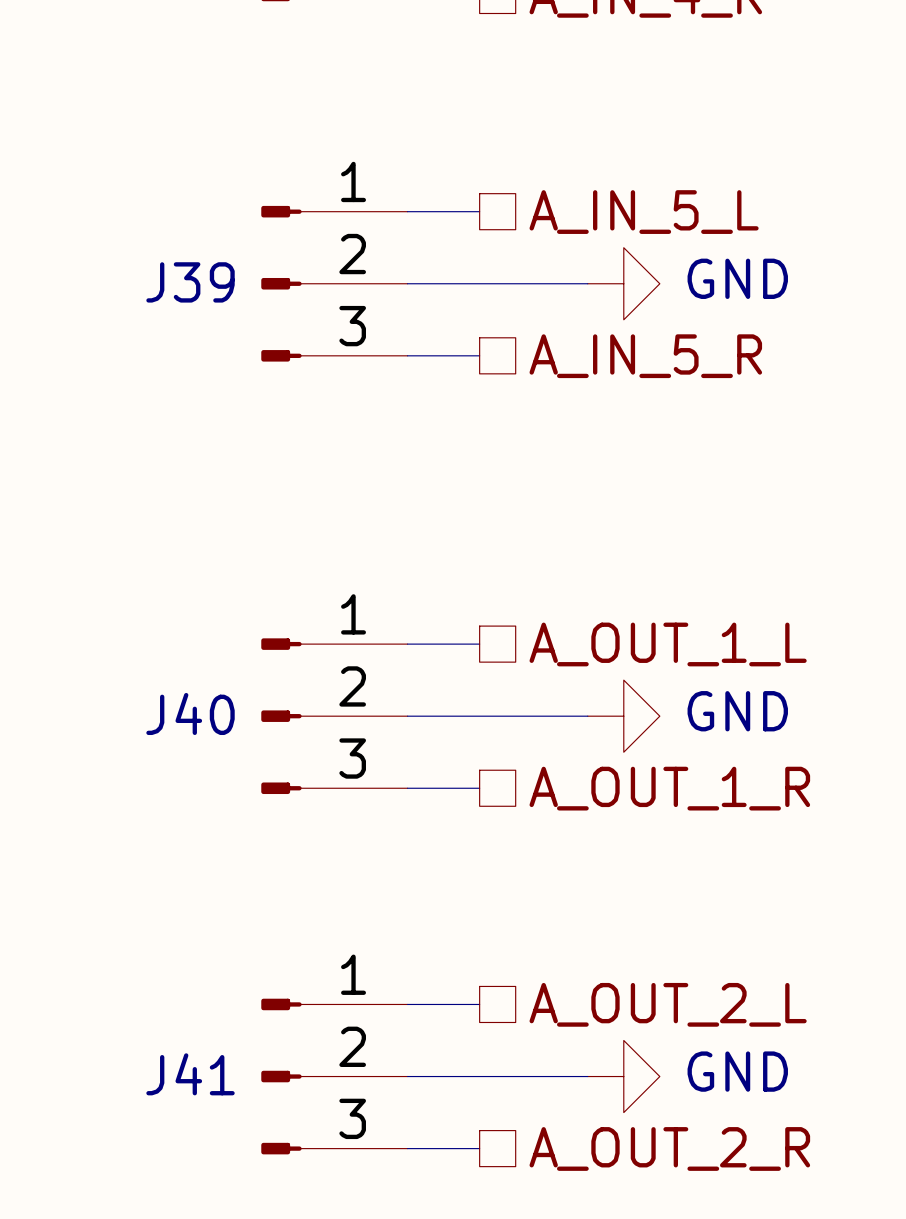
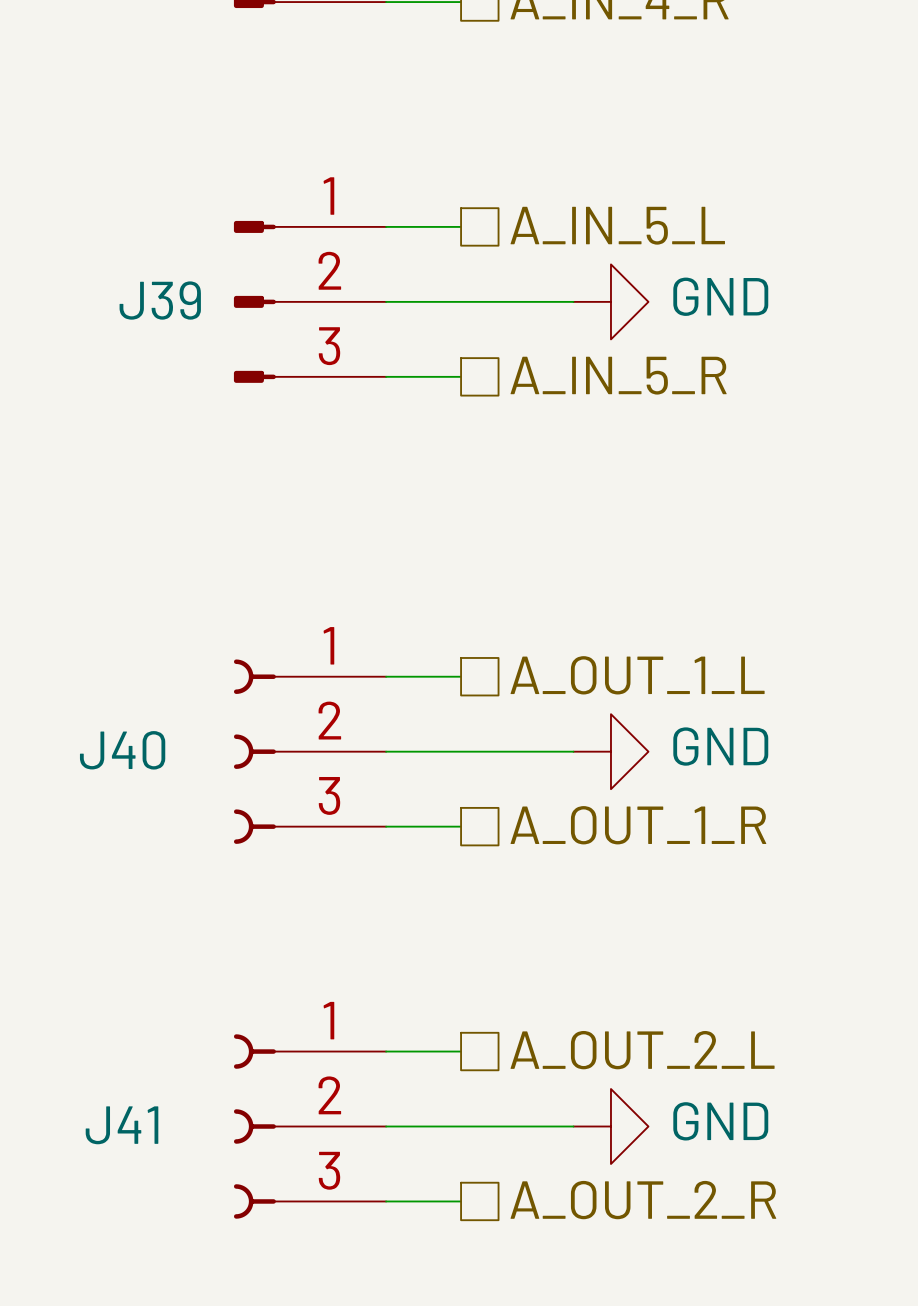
J40 symbol: [261, 638, 408, 795] -> [233, 659, 387, 844]
J40 name position: J40 (190, 713) -> J40 (122, 750)
J41 symbol: [261, 998, 408, 1155] -> [233, 1034, 387, 1219]
J41 name position: J41 (190, 1074) -> J41 (122, 1125)

